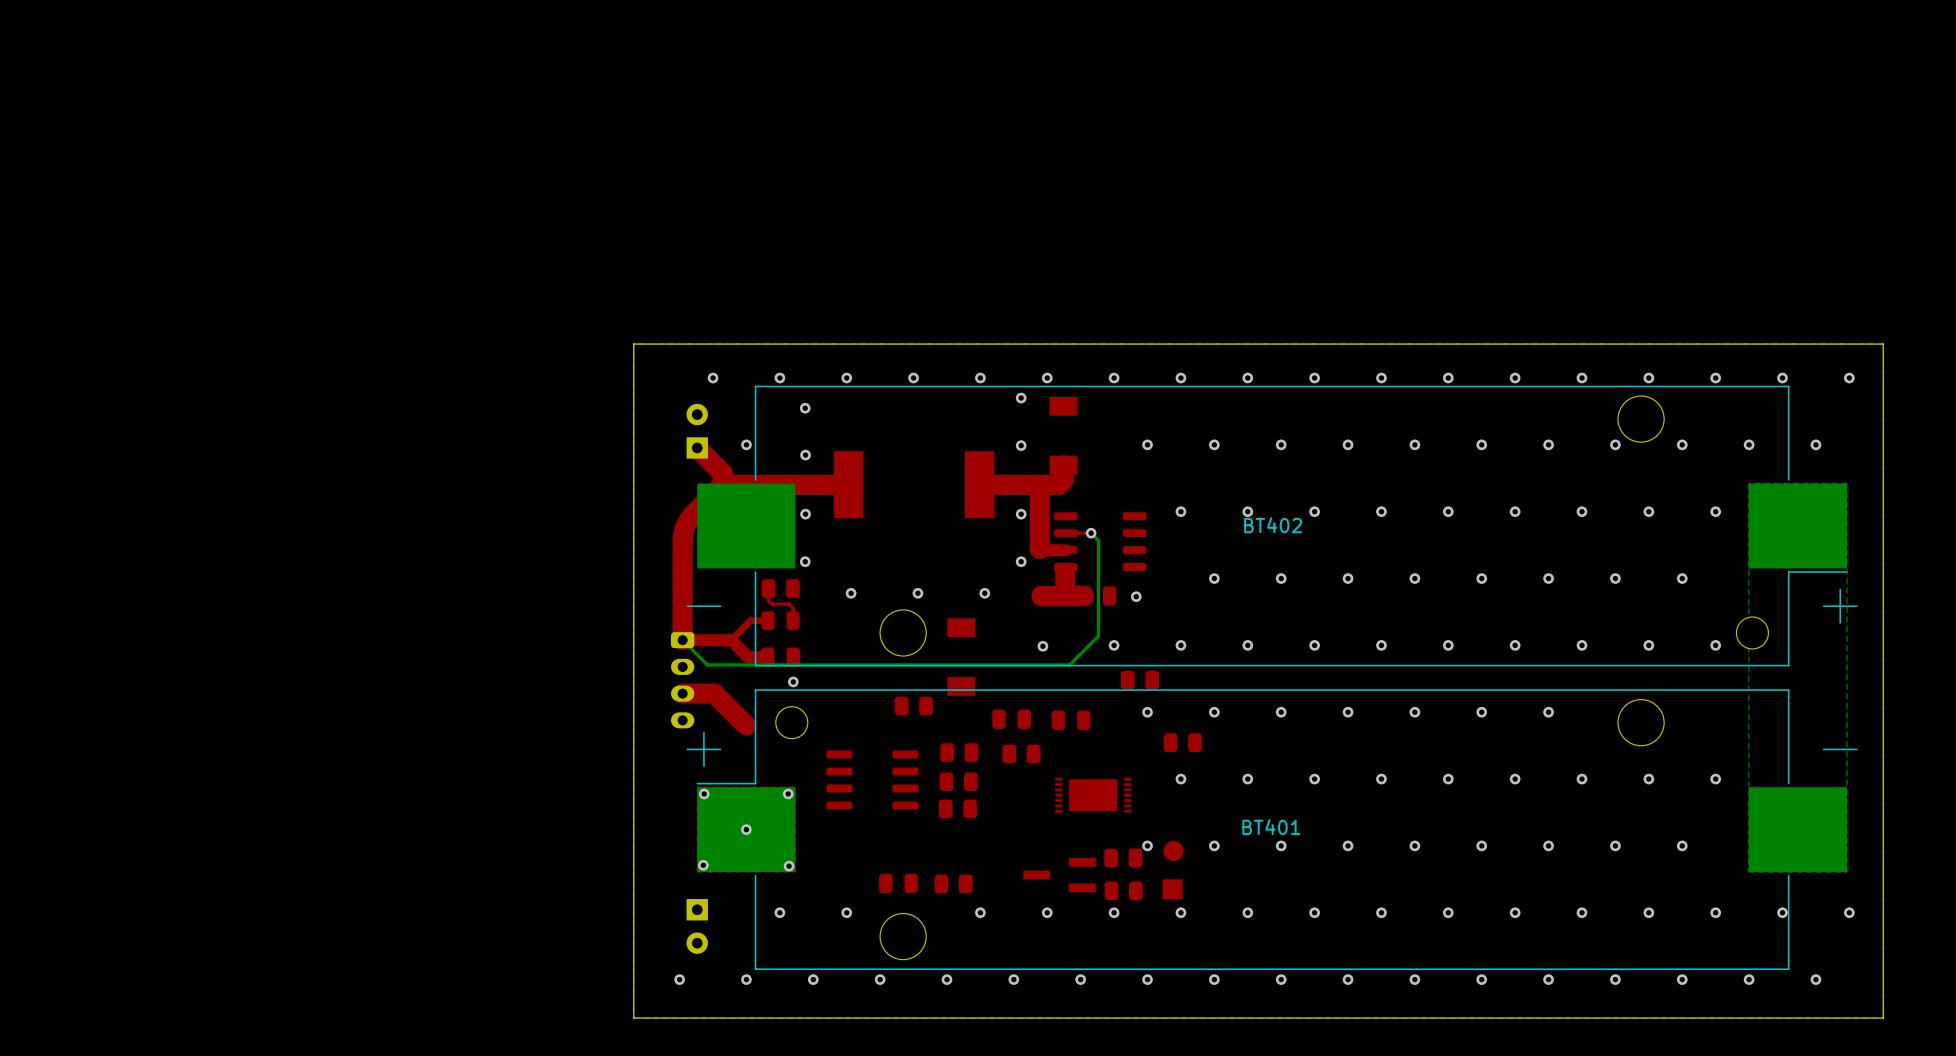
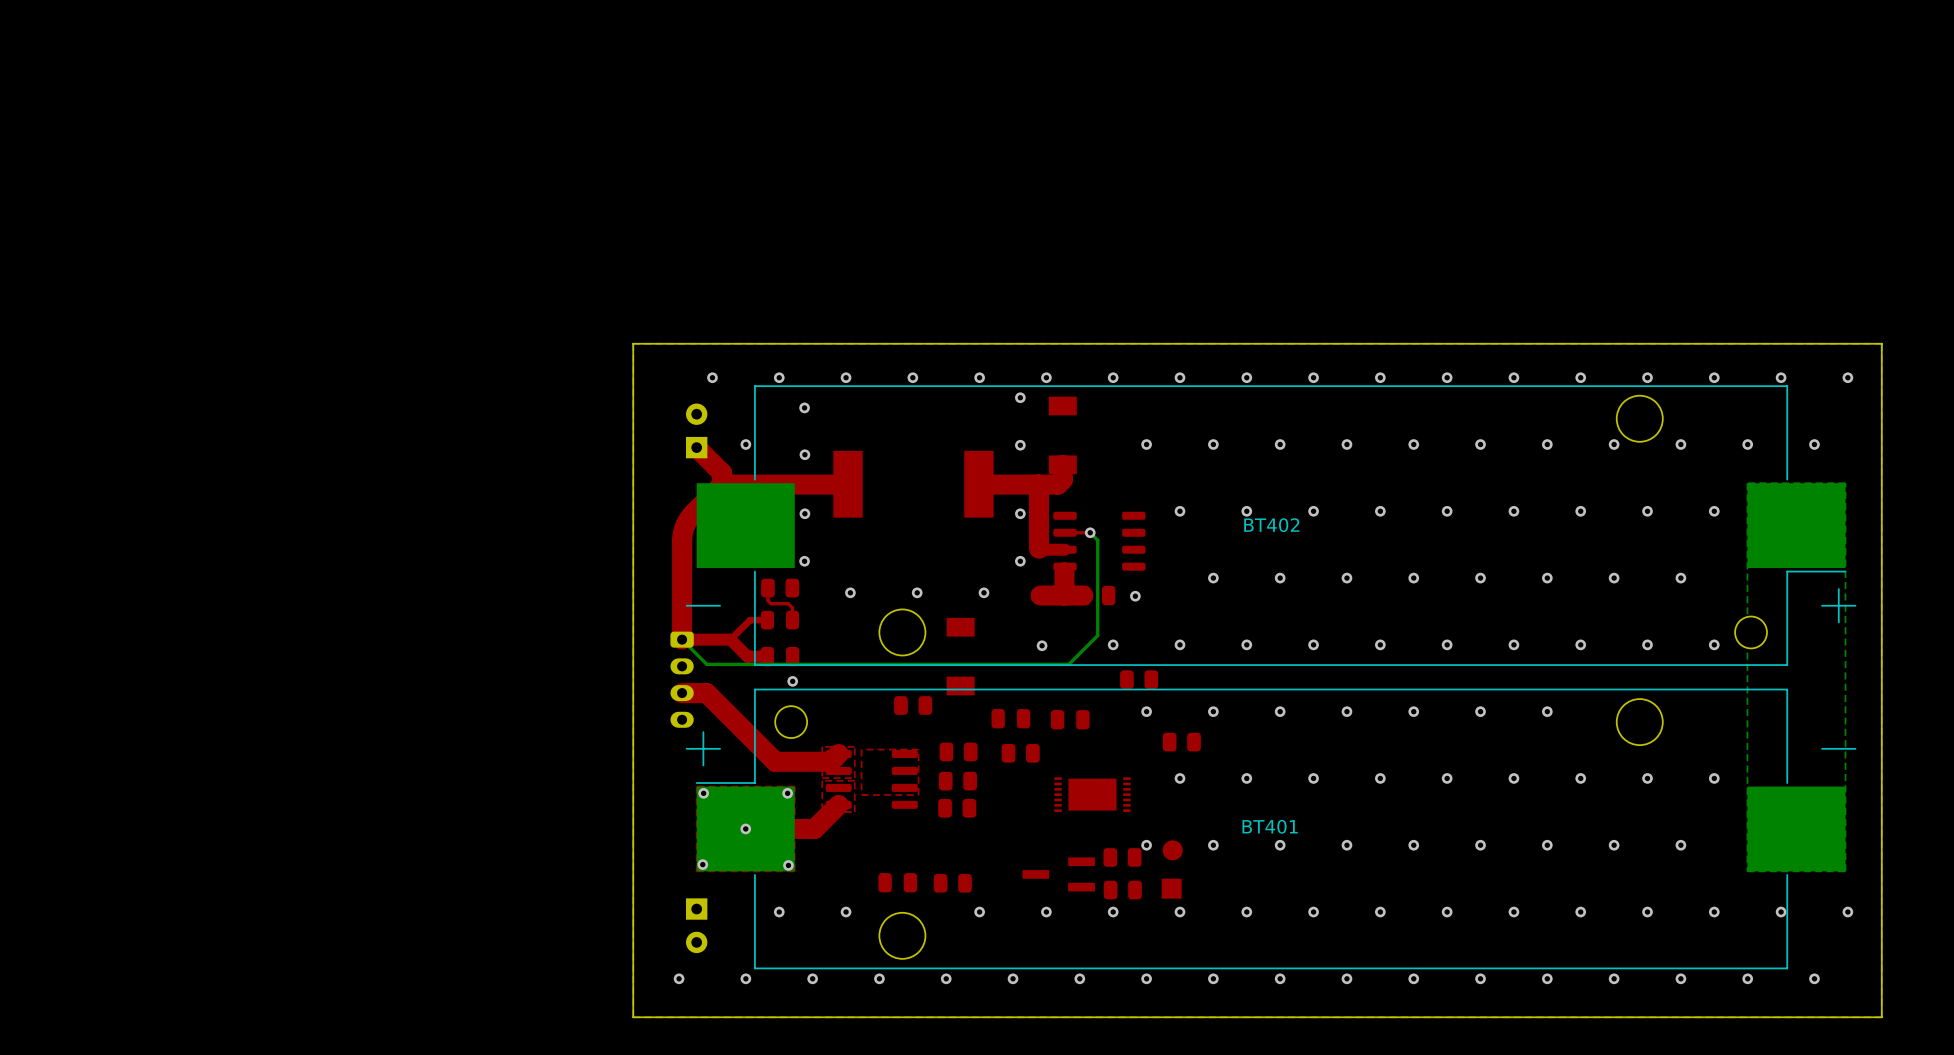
top track: (707, 693) (714, 693) (746, 725) -> (706, 693) (775, 761) (830, 761) (838, 753)
top zone outline: none -> (854, 746) (854, 778) (822, 778) (822, 746) (854, 746)
top zone outline: none -> (918, 749) (918, 795) (861, 795) (861, 749) (918, 749)
top zone outline: none -> (854, 780) (854, 812) (822, 812) (822, 780) (854, 780)
top track: none -> (838, 804) (814, 828) (745, 828)

